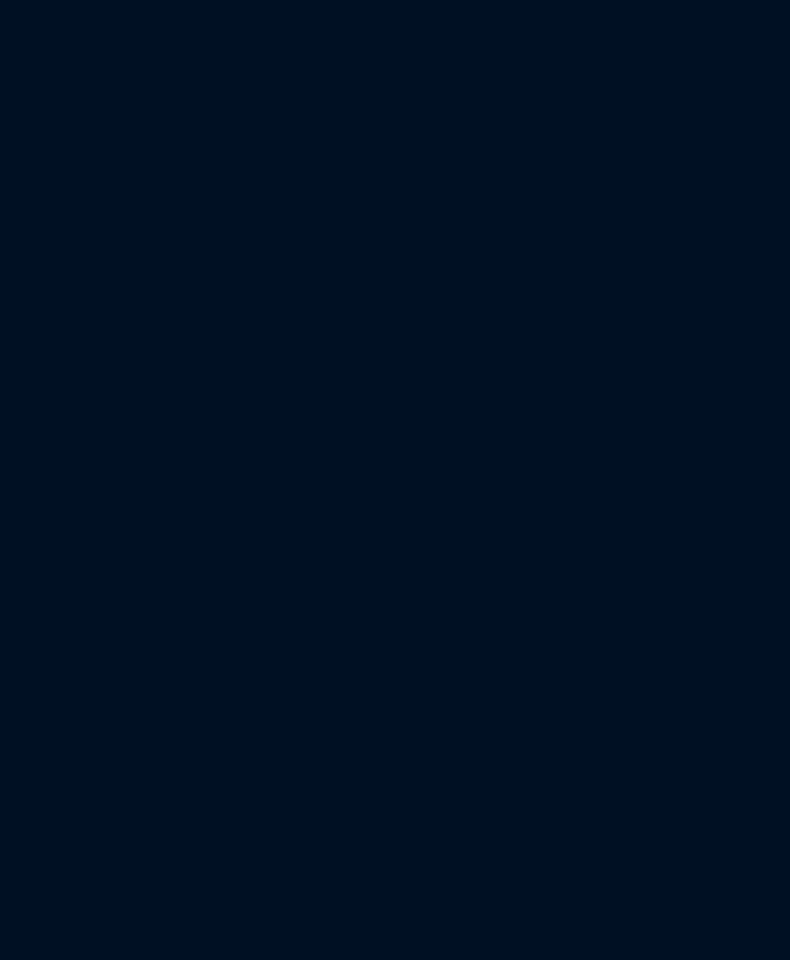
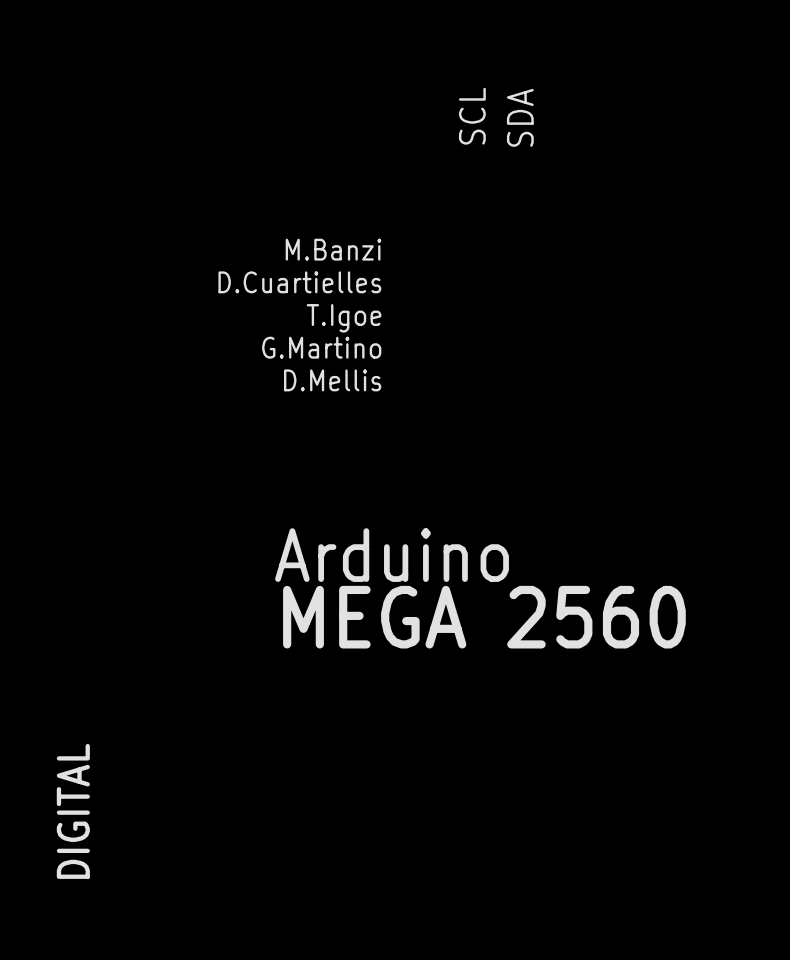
text: none -> SCL (472, 116)
text: none -> SDA (520, 117)
text: none -> M.Banzi (333, 249)
text: none -> D.Cuartielles (299, 282)
text: none -> T.Igoe (344, 318)
text: none -> G.Martino (321, 347)
text: none -> D.Mellis (332, 380)
text: none -> Arduino (392, 555)
text: none -> MEGA 2560 (484, 617)
text: none -> DIGITAL (73, 811)

